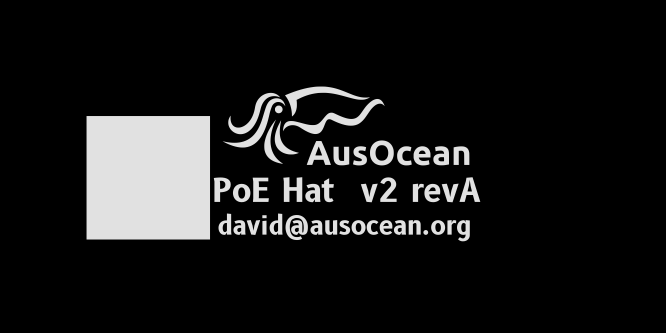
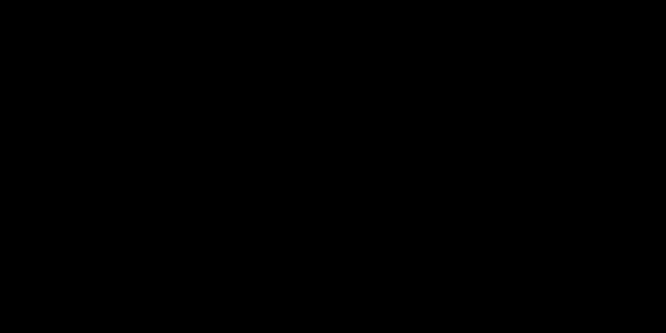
drawing: [86, 86, 470, 240] -> none
text: PoE Hat (273, 189) -> none
text: v2 revA (420, 189) -> none
text: david@ausocean.org (344, 227) -> none

